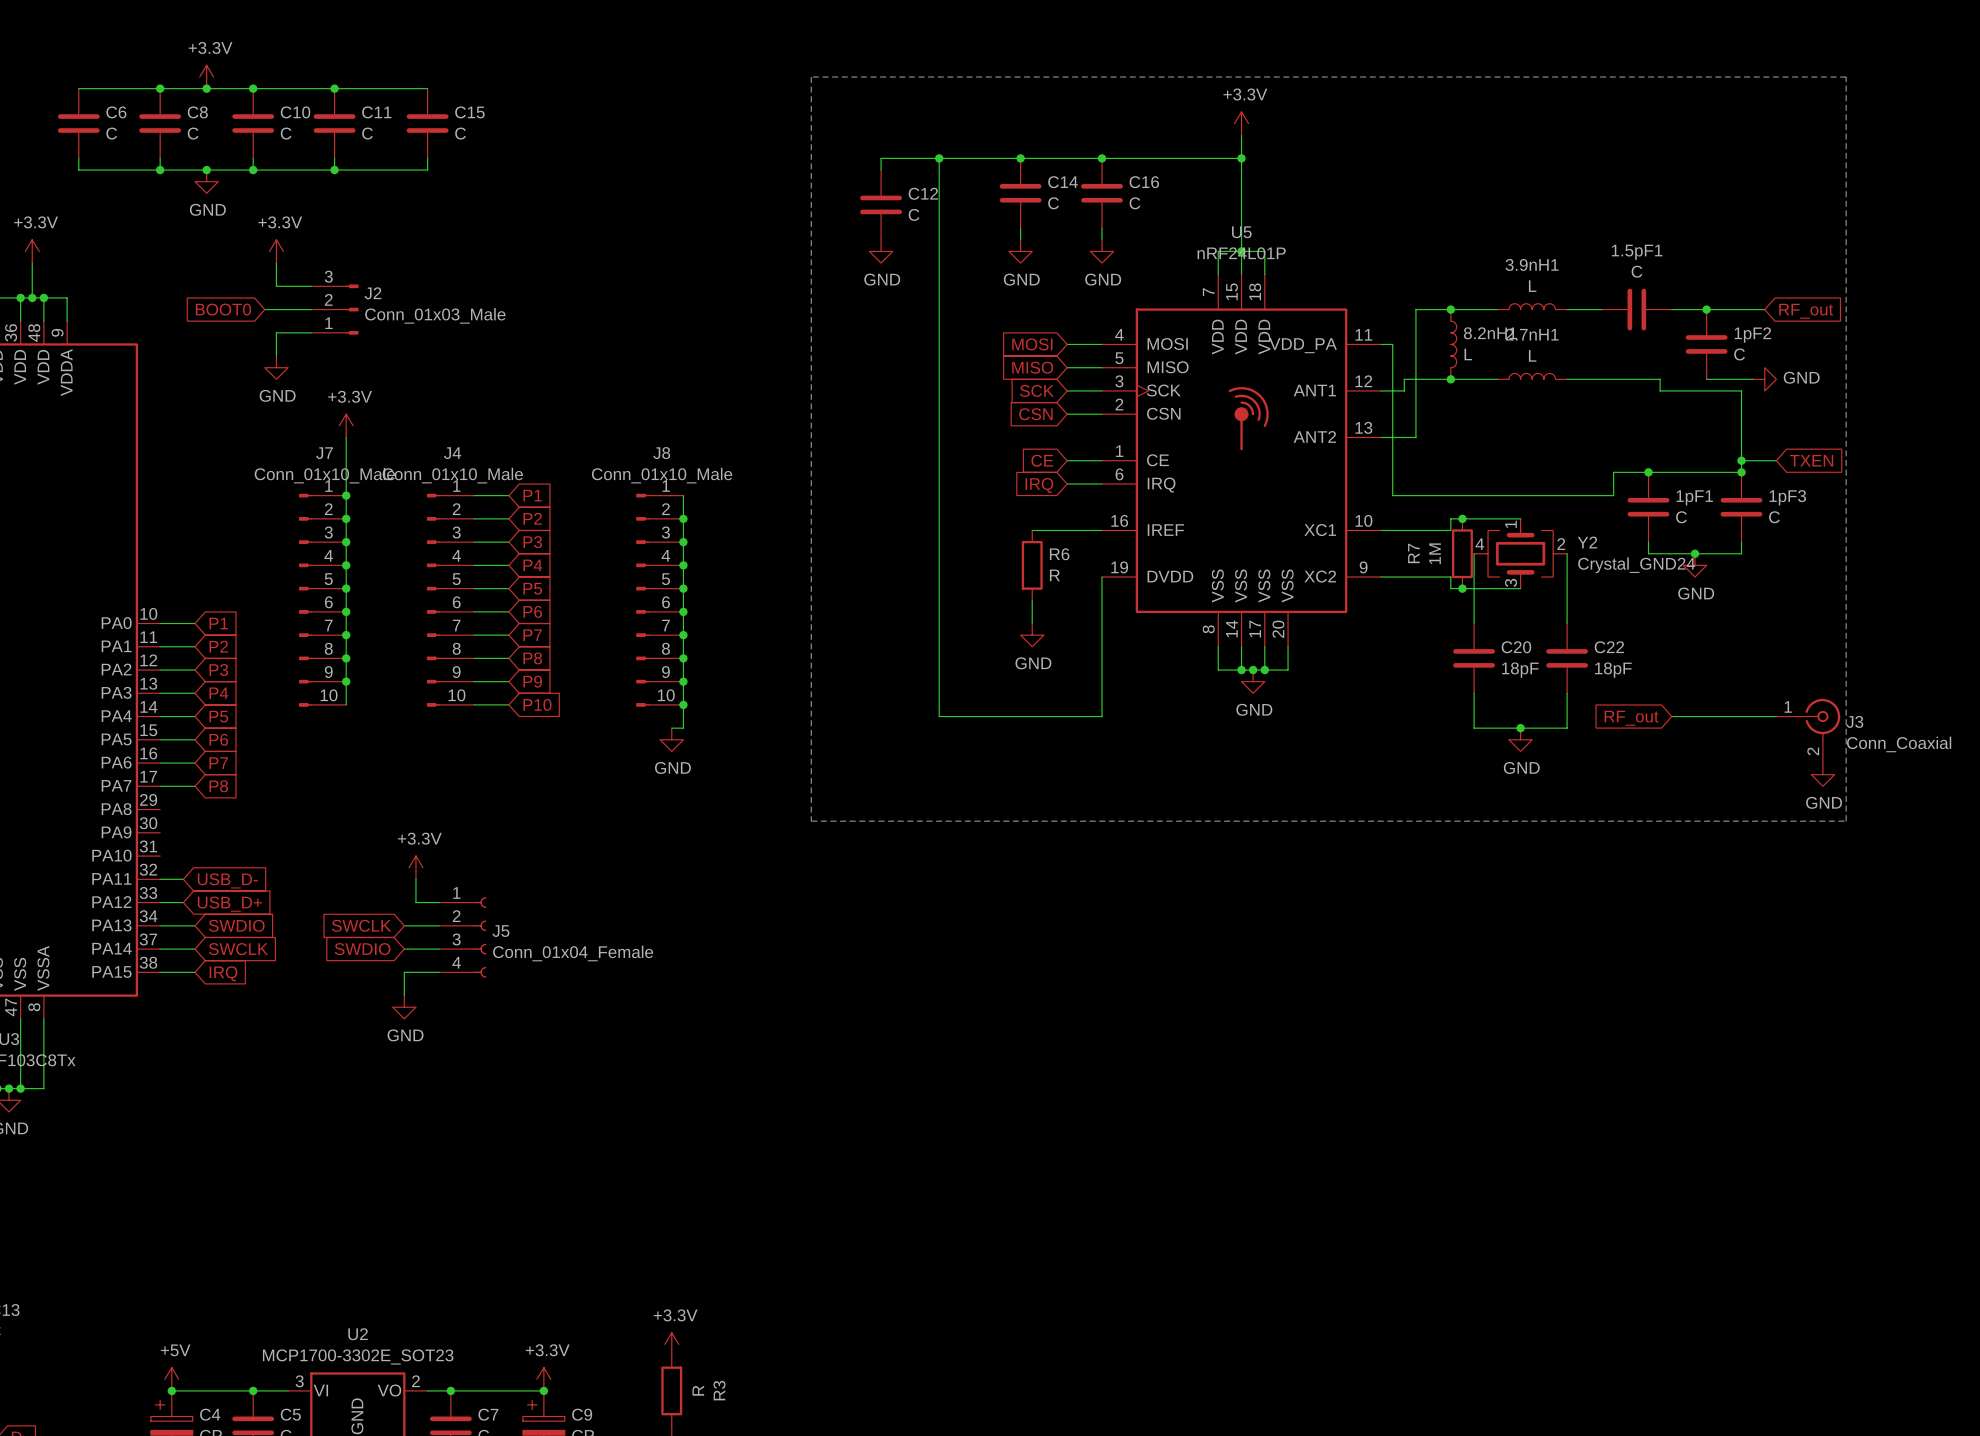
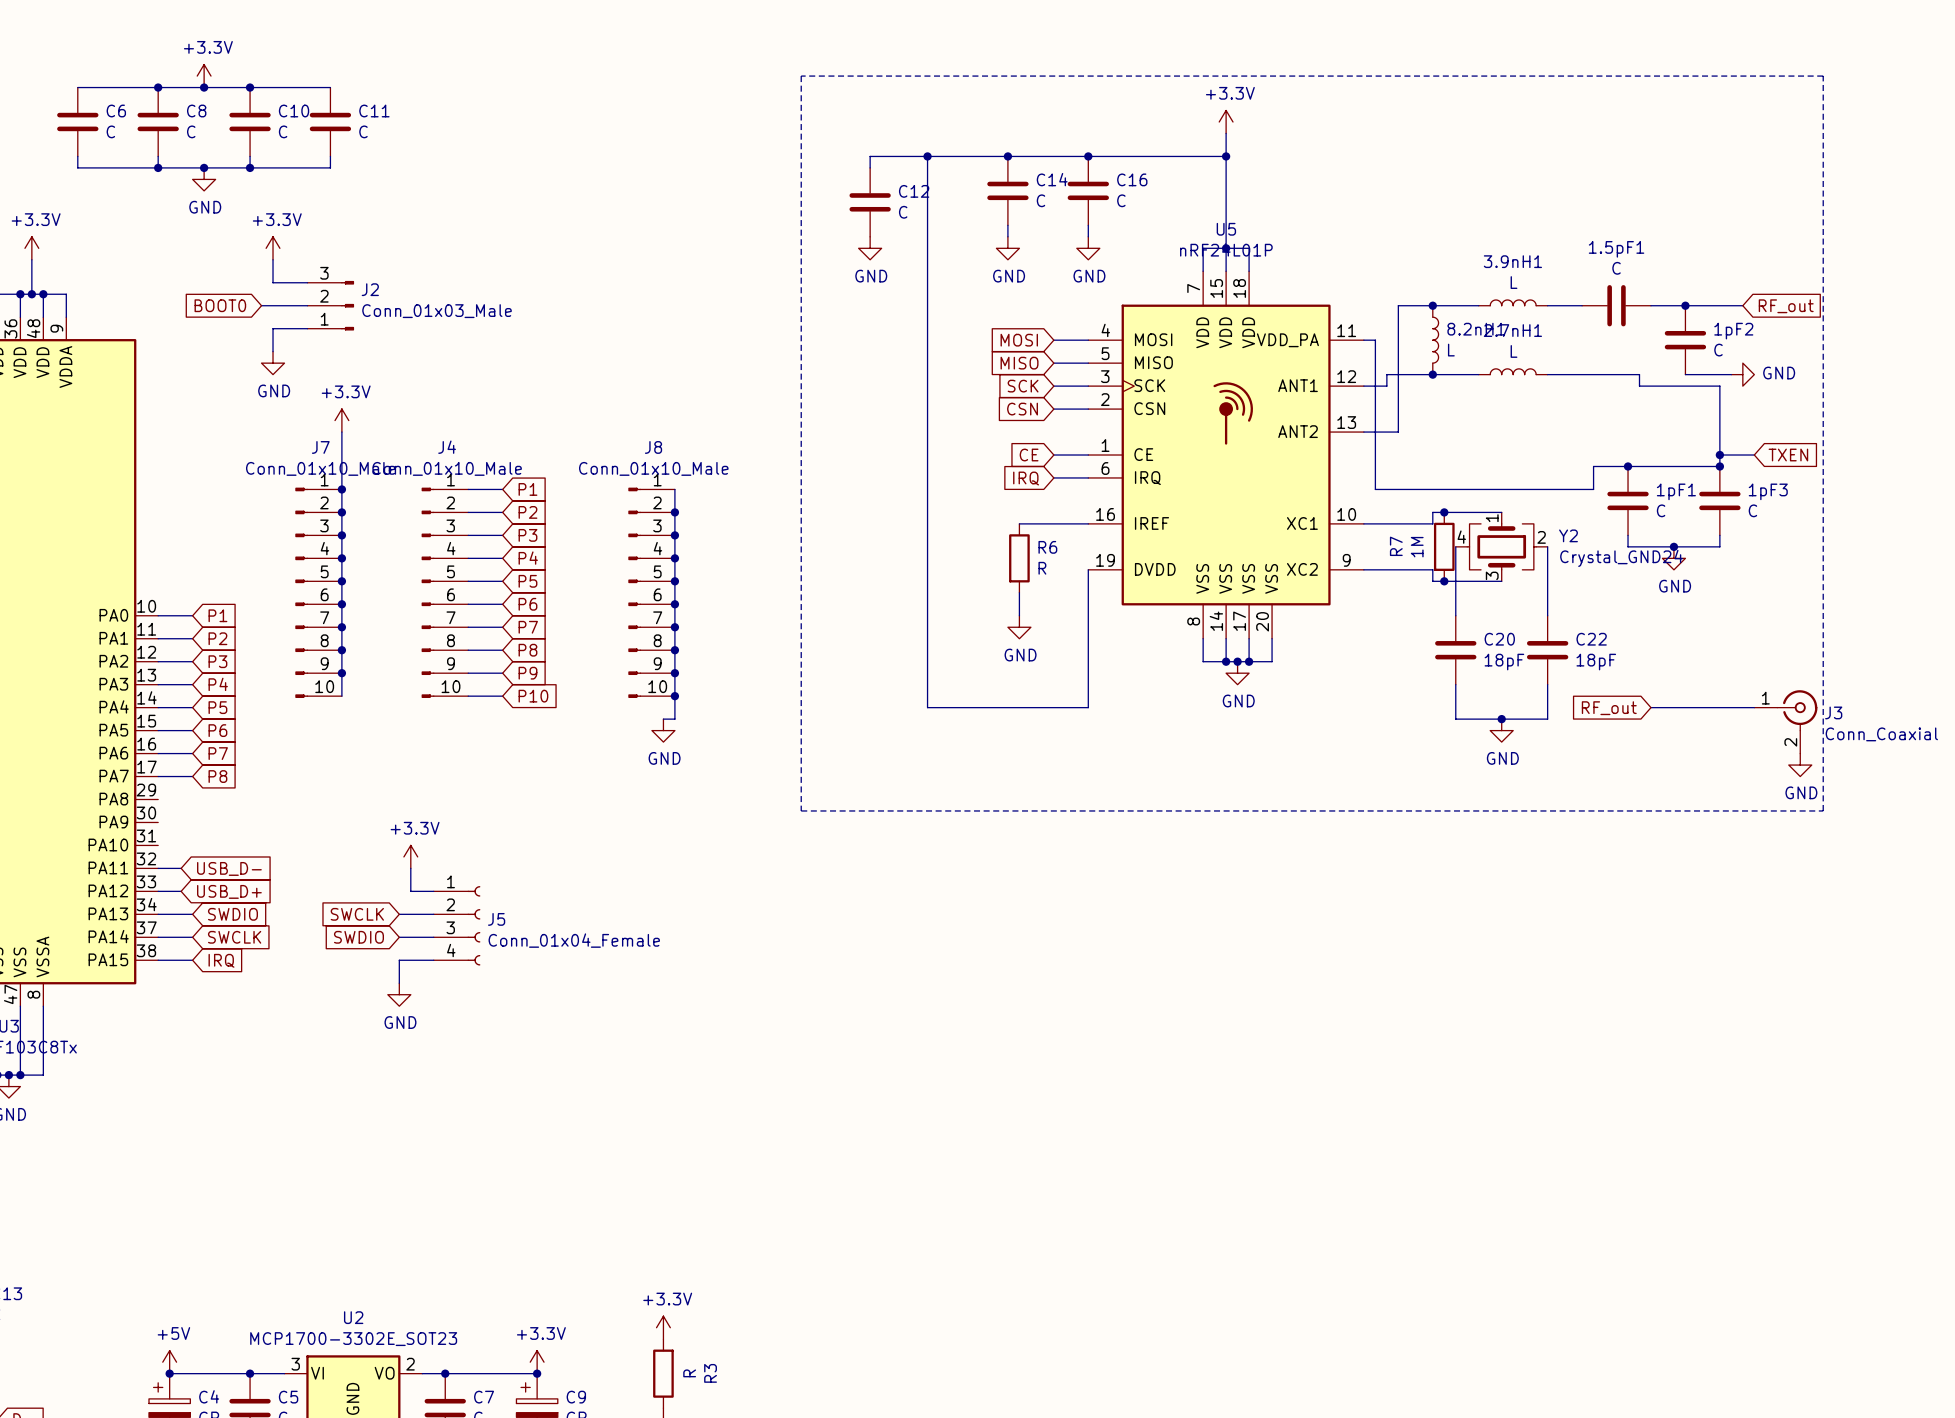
wire: (334, 88) (427, 88) -> none
junction: (334, 88) -> none
C15: C (427, 123) -> none
wire: (427, 158) (427, 170) (334, 170) -> none
junction: (334, 170) -> none

